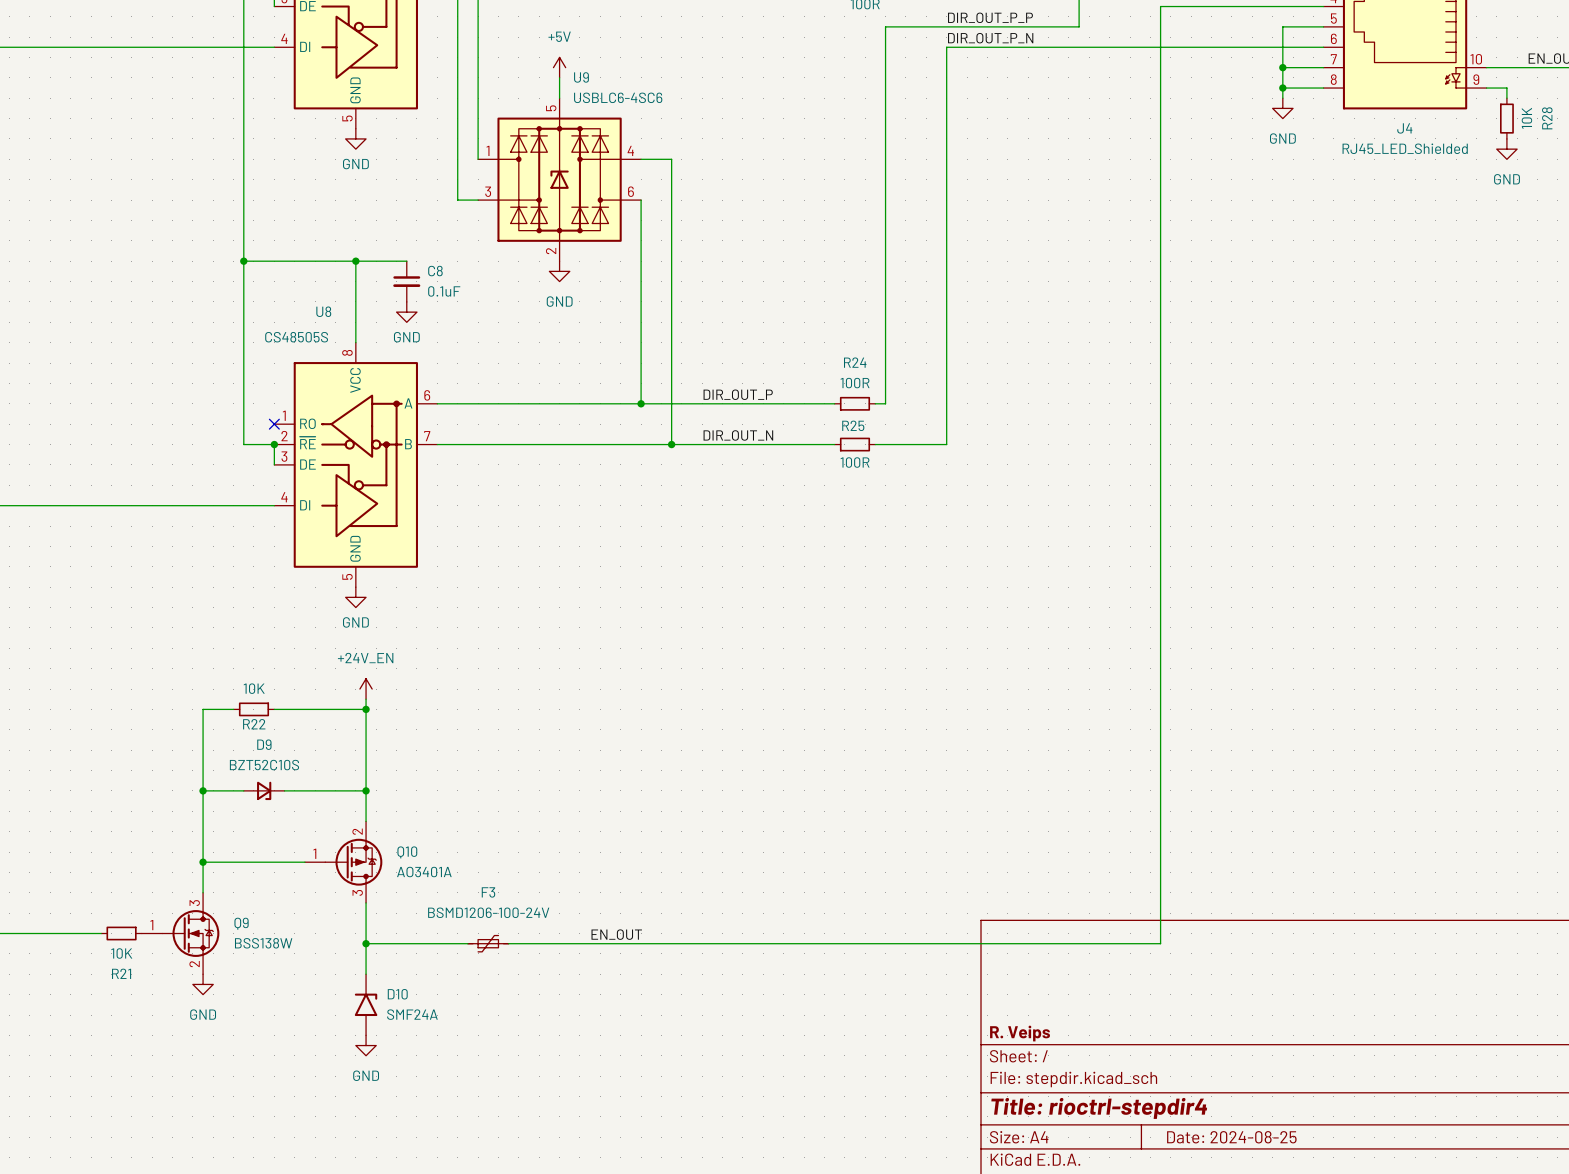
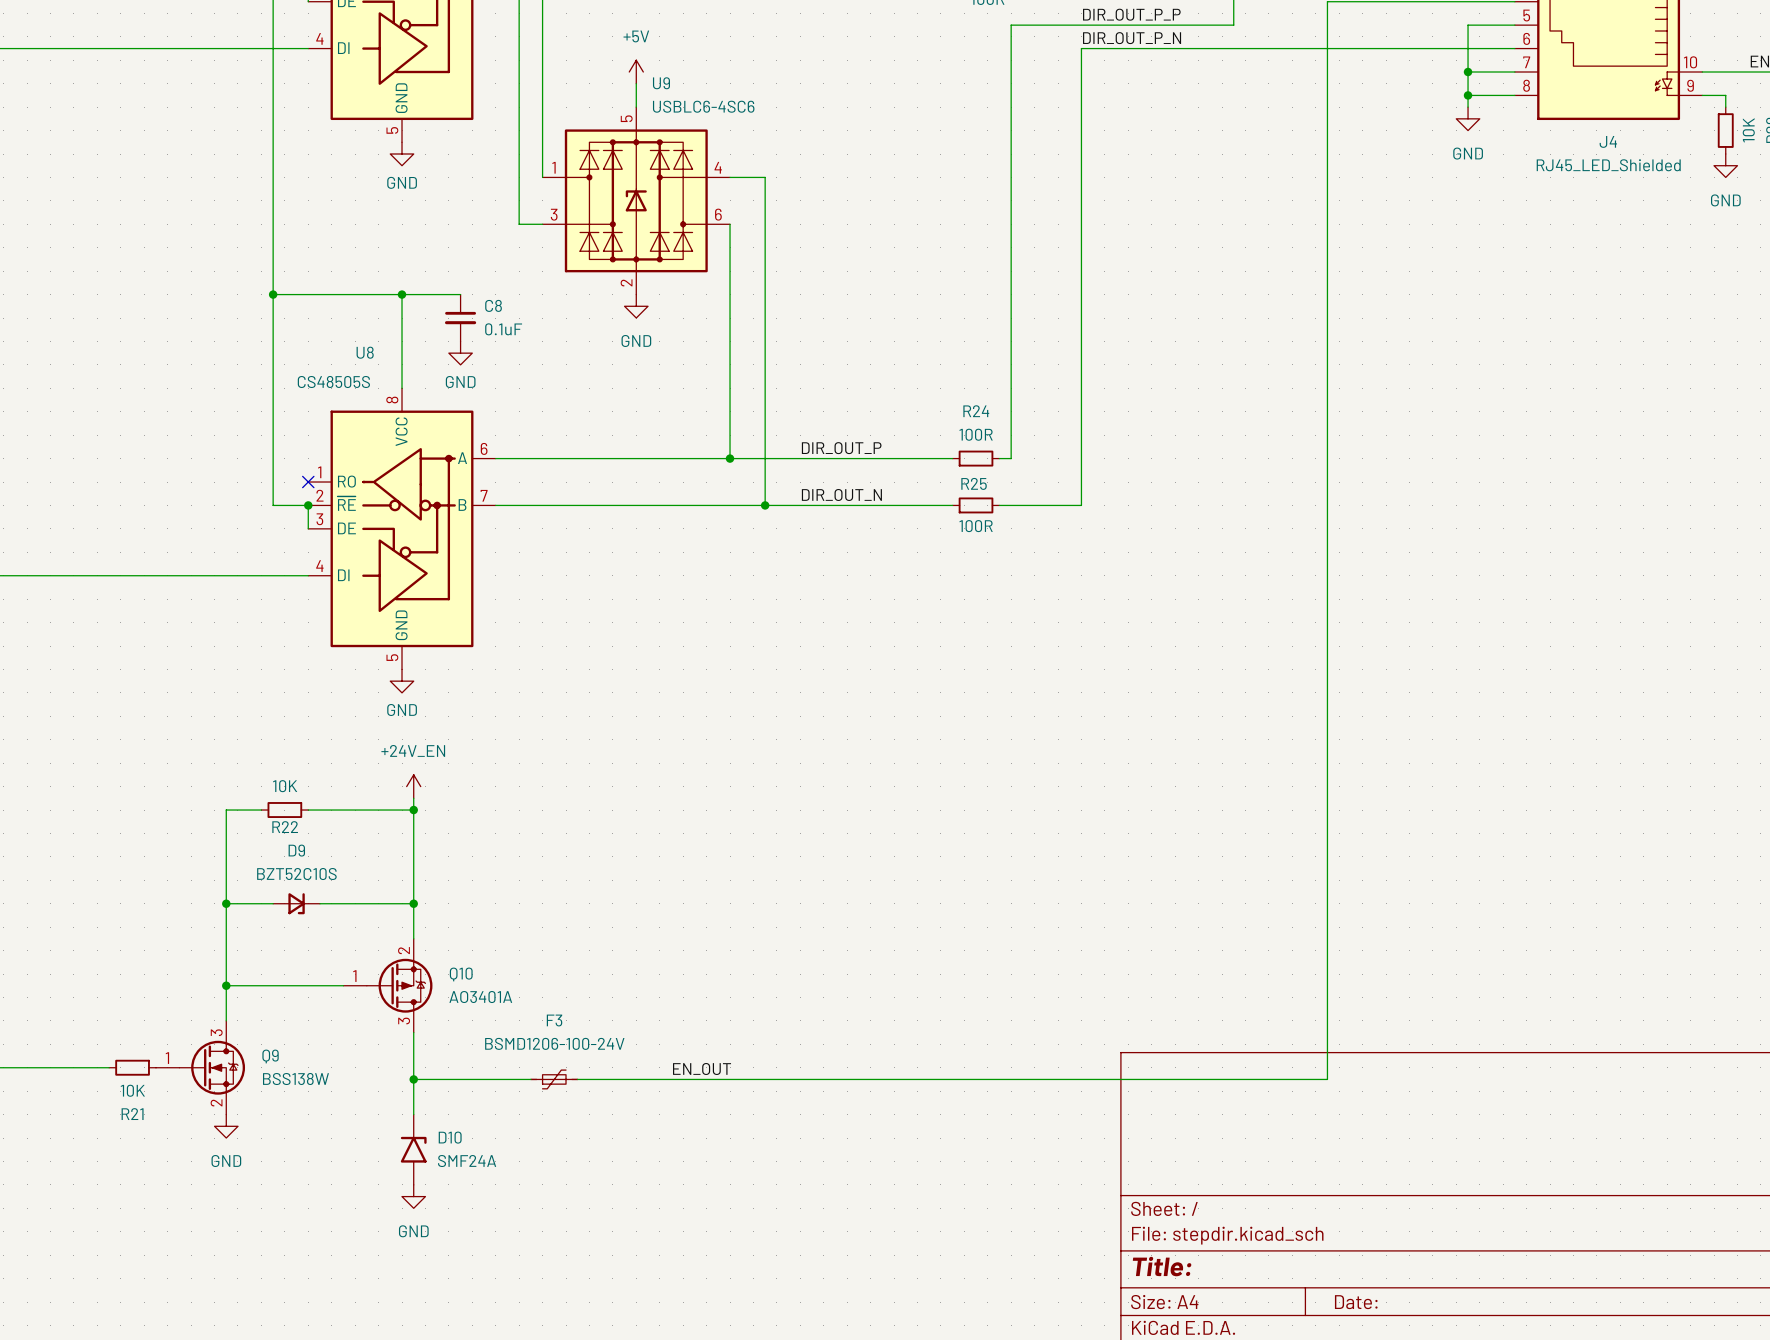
title block: R. Veips (1020, 1033) -> none
title block: Title: rioctrl-stepdir4 (1099, 1108) -> Title: (1162, 1266)
title block: Date: 2024-08-25 (1231, 1137) -> Date: (1356, 1302)

